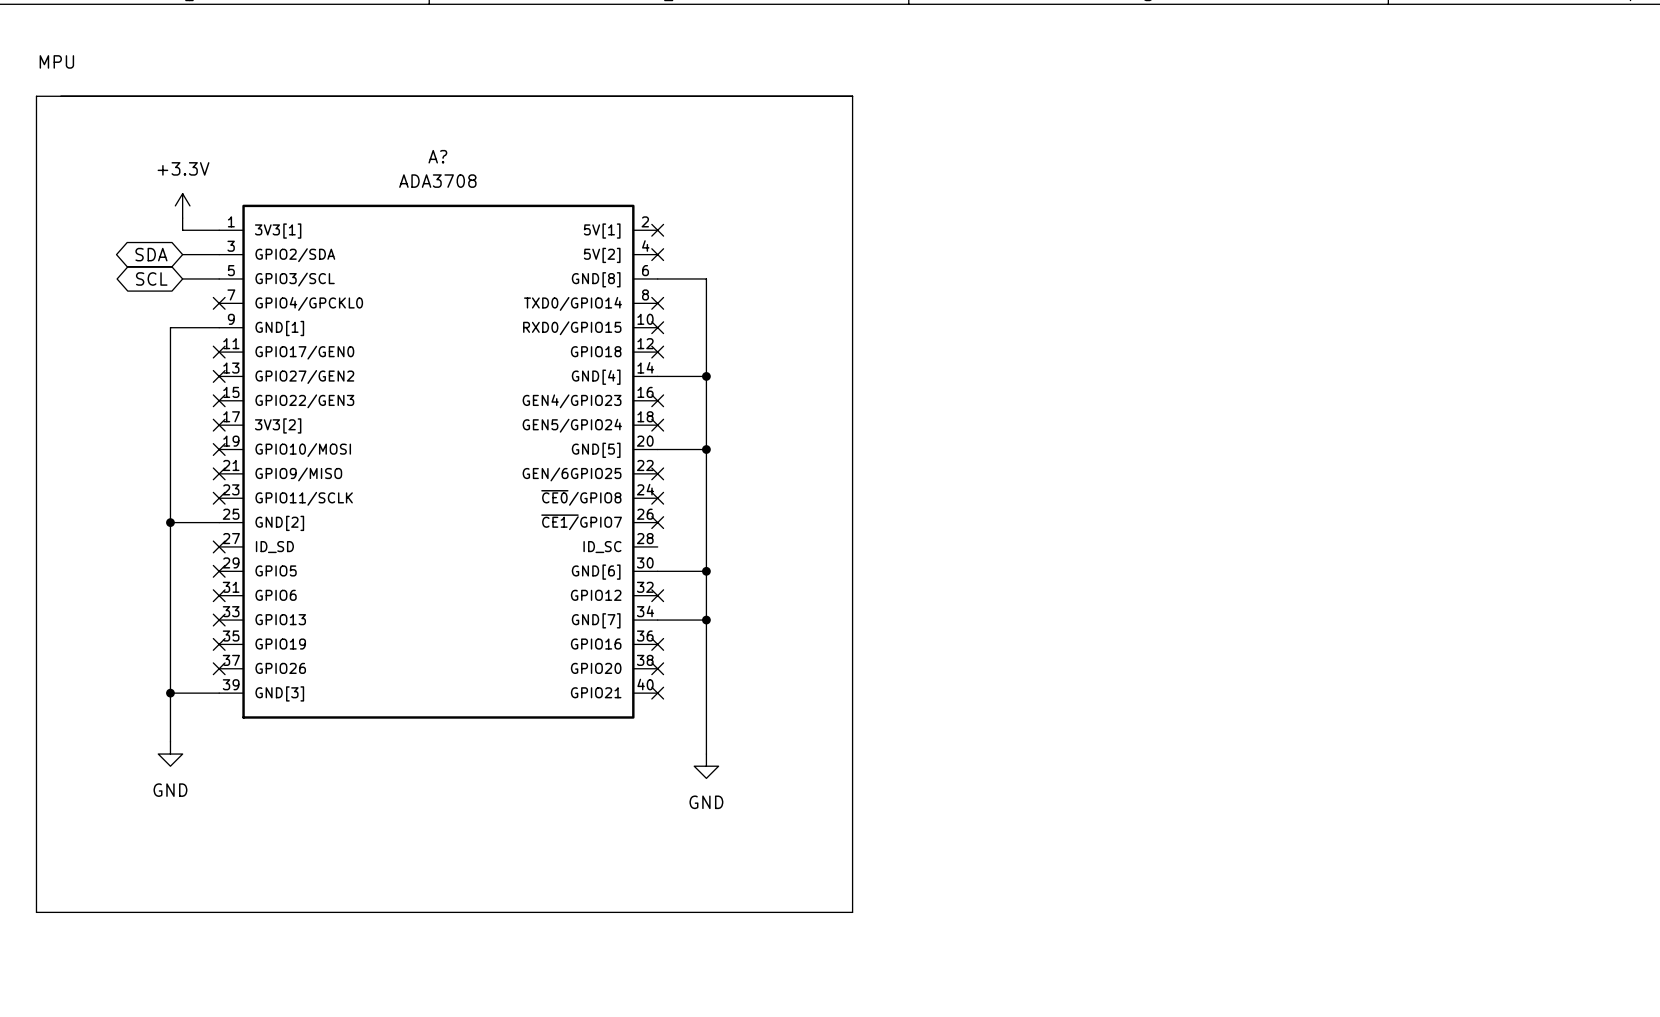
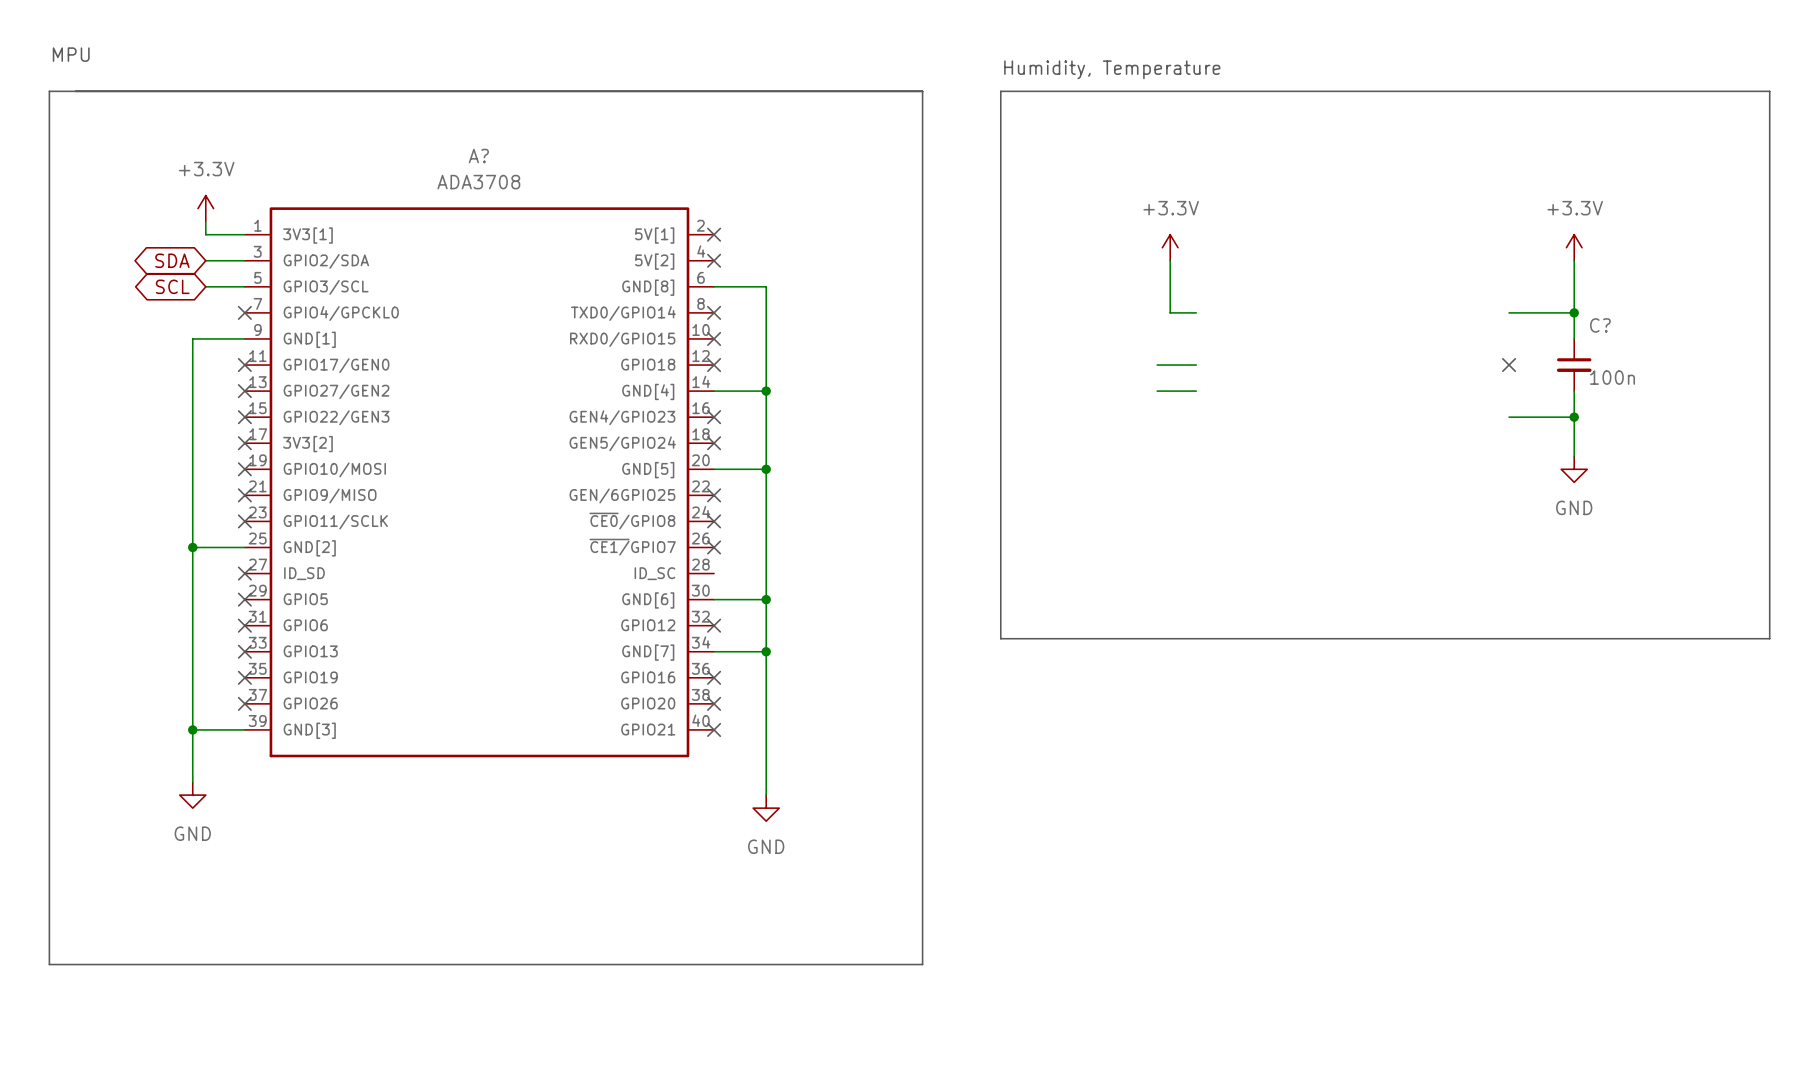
text: none -> Humidity, Temperature (1112, 69)
line: none -> (1000, 91) (1000, 638) (1769, 638) (1769, 91) (1000, 91)
power symbol: none -> +3.3V (1170, 247)
power symbol: none -> +3.3V (1574, 247)
wire: none -> (1170, 260) (1170, 312) (1196, 312)
wire: none -> (1574, 260) (1574, 338)
wire: none -> (1509, 312) (1574, 312)
junction: none -> (1574, 312)
wire: none -> (1157, 365) (1196, 365)
no-connect mark: none -> (1509, 365)
C?: none -> 100n (1574, 365)
wire: none -> (1157, 391) (1196, 391)
wire: none -> (1574, 391) (1574, 456)
wire: none -> (1509, 417) (1574, 417)
junction: none -> (1574, 417)
power symbol: none -> GND (1574, 469)

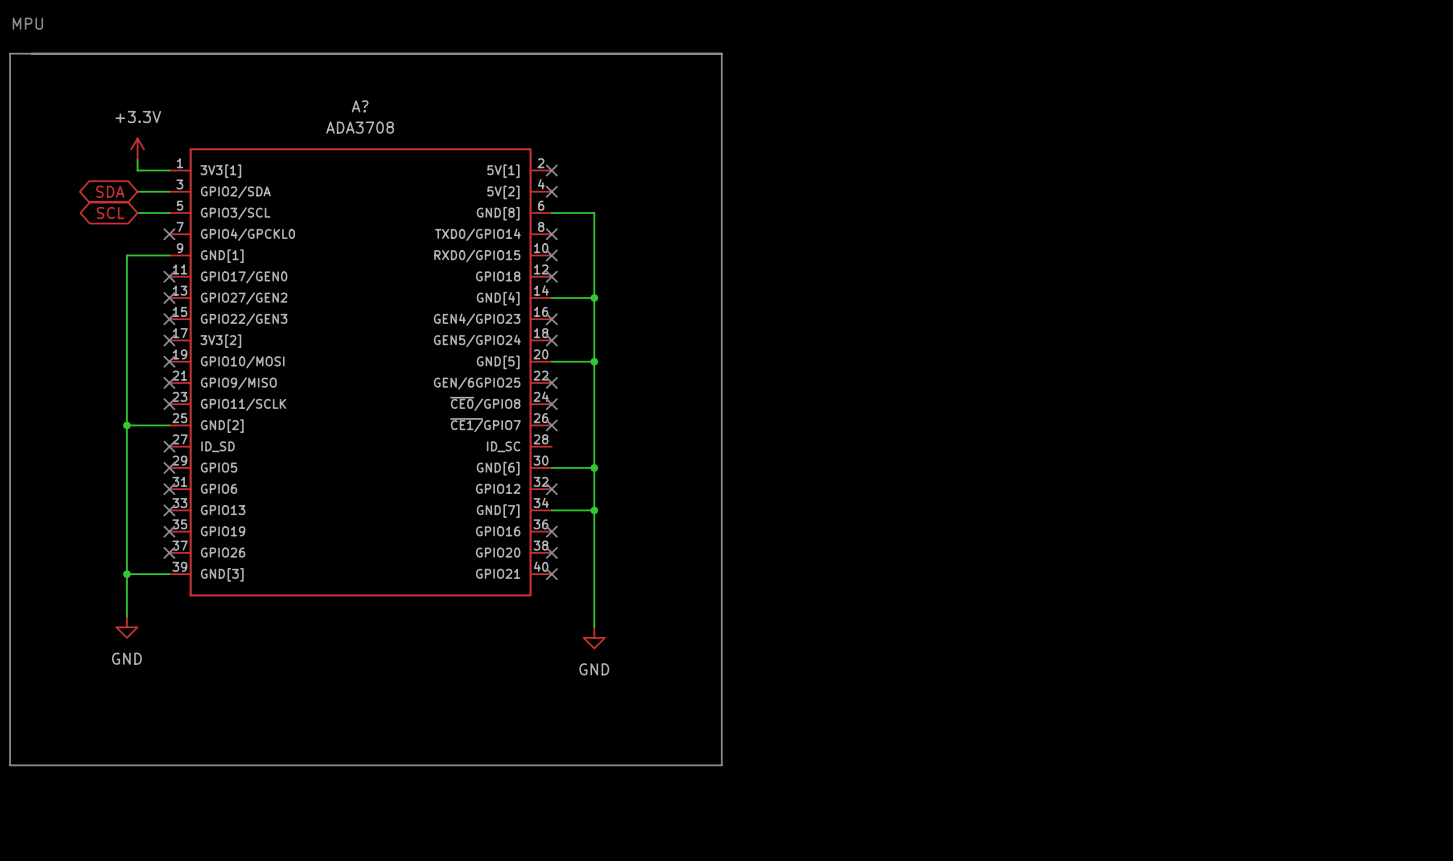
text: Humidity, Temperature (1112, 69) -> none
line: (1000, 91) (1000, 638) (1769, 638) (1769, 91) (1000, 91) -> none
power symbol: +3.3V (1170, 247) -> none
power symbol: +3.3V (1574, 247) -> none
wire: (1170, 260) (1170, 312) (1196, 312) -> none
wire: (1574, 260) (1574, 338) -> none
wire: (1509, 312) (1574, 312) -> none
junction: (1574, 312) -> none
wire: (1157, 365) (1196, 365) -> none
no-connect mark: (1509, 365) -> none
C?: 100n (1574, 365) -> none
wire: (1157, 391) (1196, 391) -> none
wire: (1574, 391) (1574, 456) -> none
wire: (1509, 417) (1574, 417) -> none
junction: (1574, 417) -> none
power symbol: GND (1574, 469) -> none

